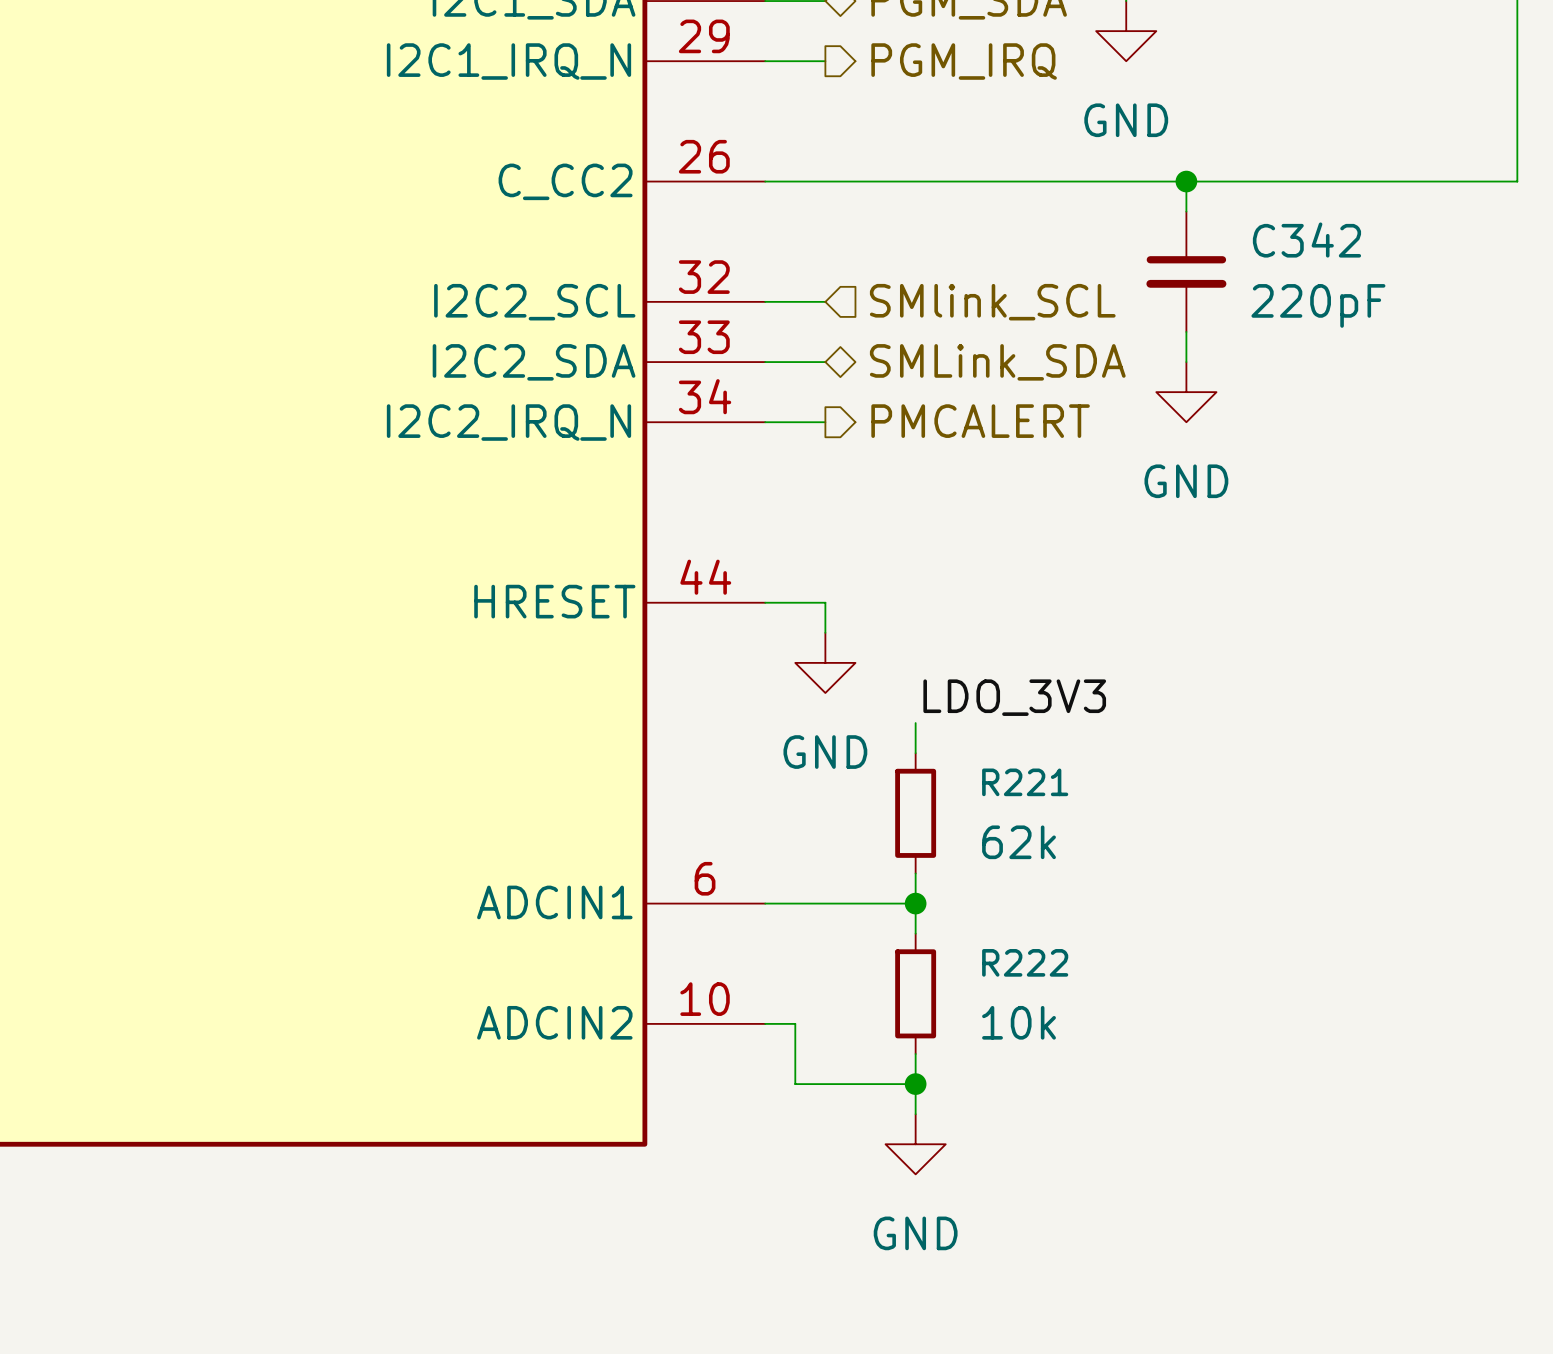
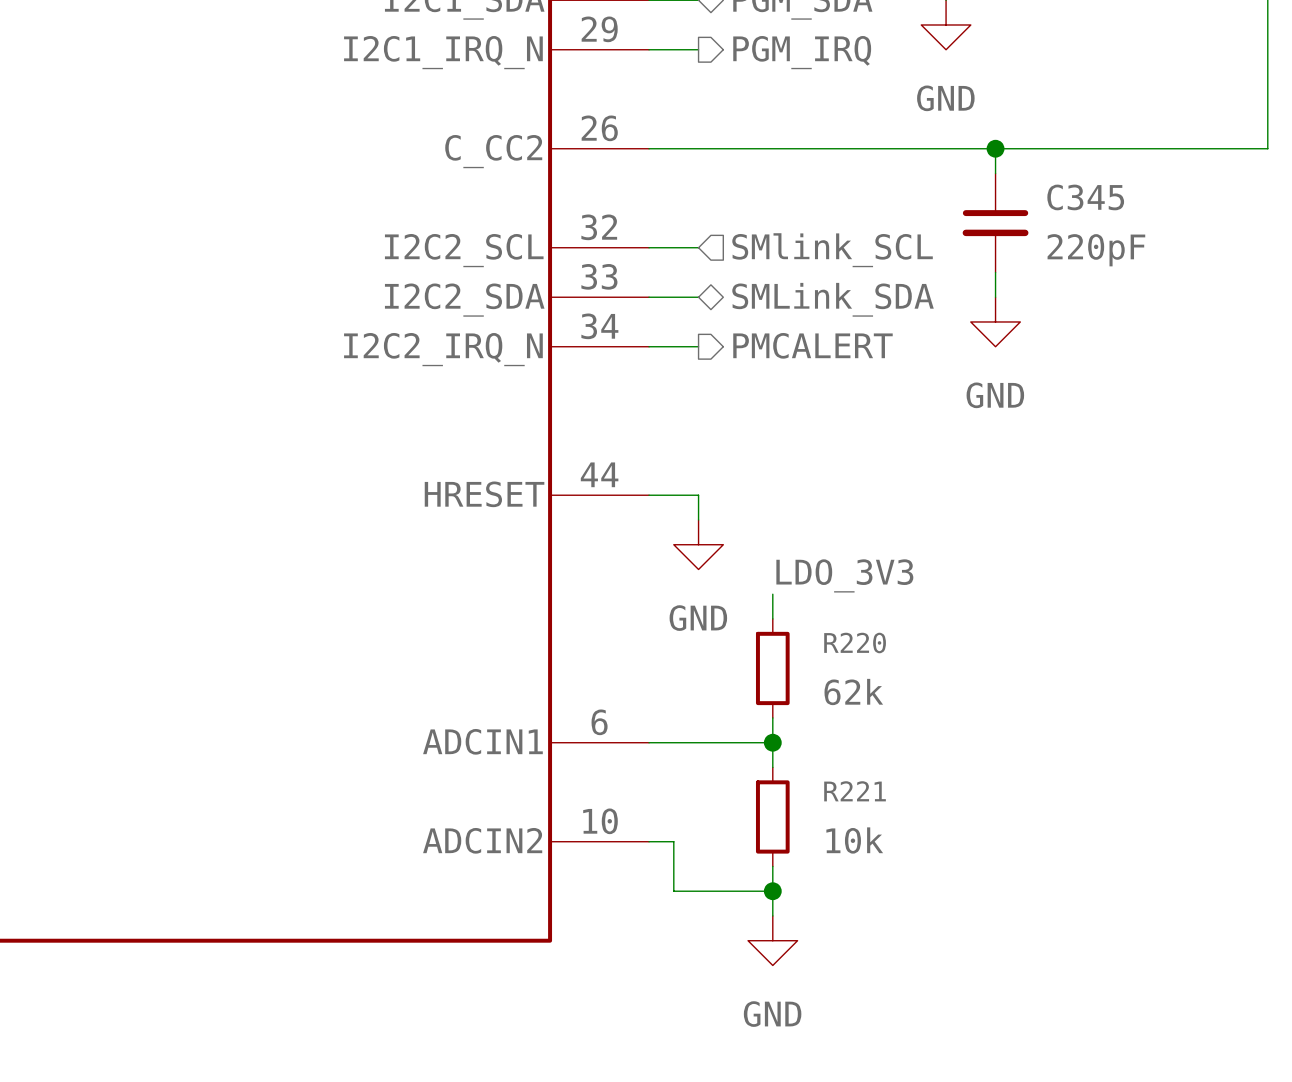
C342 name: C342 (1306, 240) -> C345 (1085, 197)
R221 name: R221 (1025, 782) -> R220 (855, 643)
R222 name: R222 (1025, 962) -> R221 (855, 791)

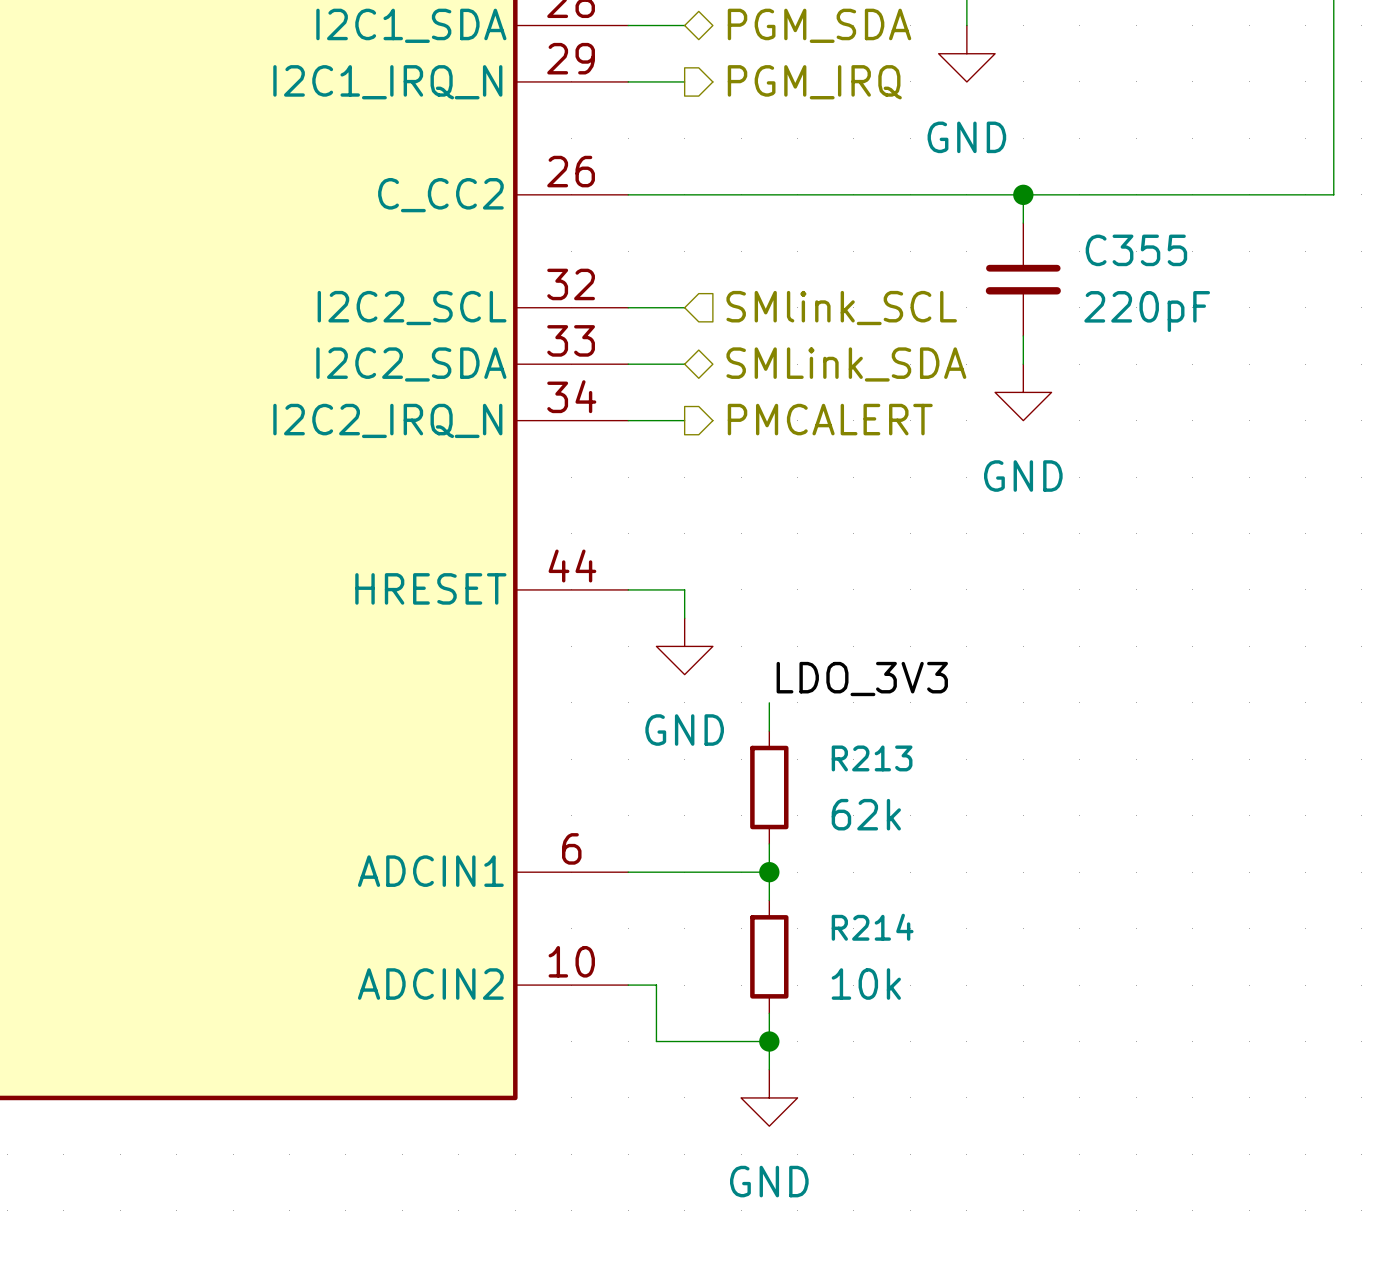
C345 name: C345 (1085, 197) -> C355 (1136, 250)
R220 name: R220 (855, 643) -> R213 (872, 758)
R221 name: R221 (855, 791) -> R214 (872, 927)

